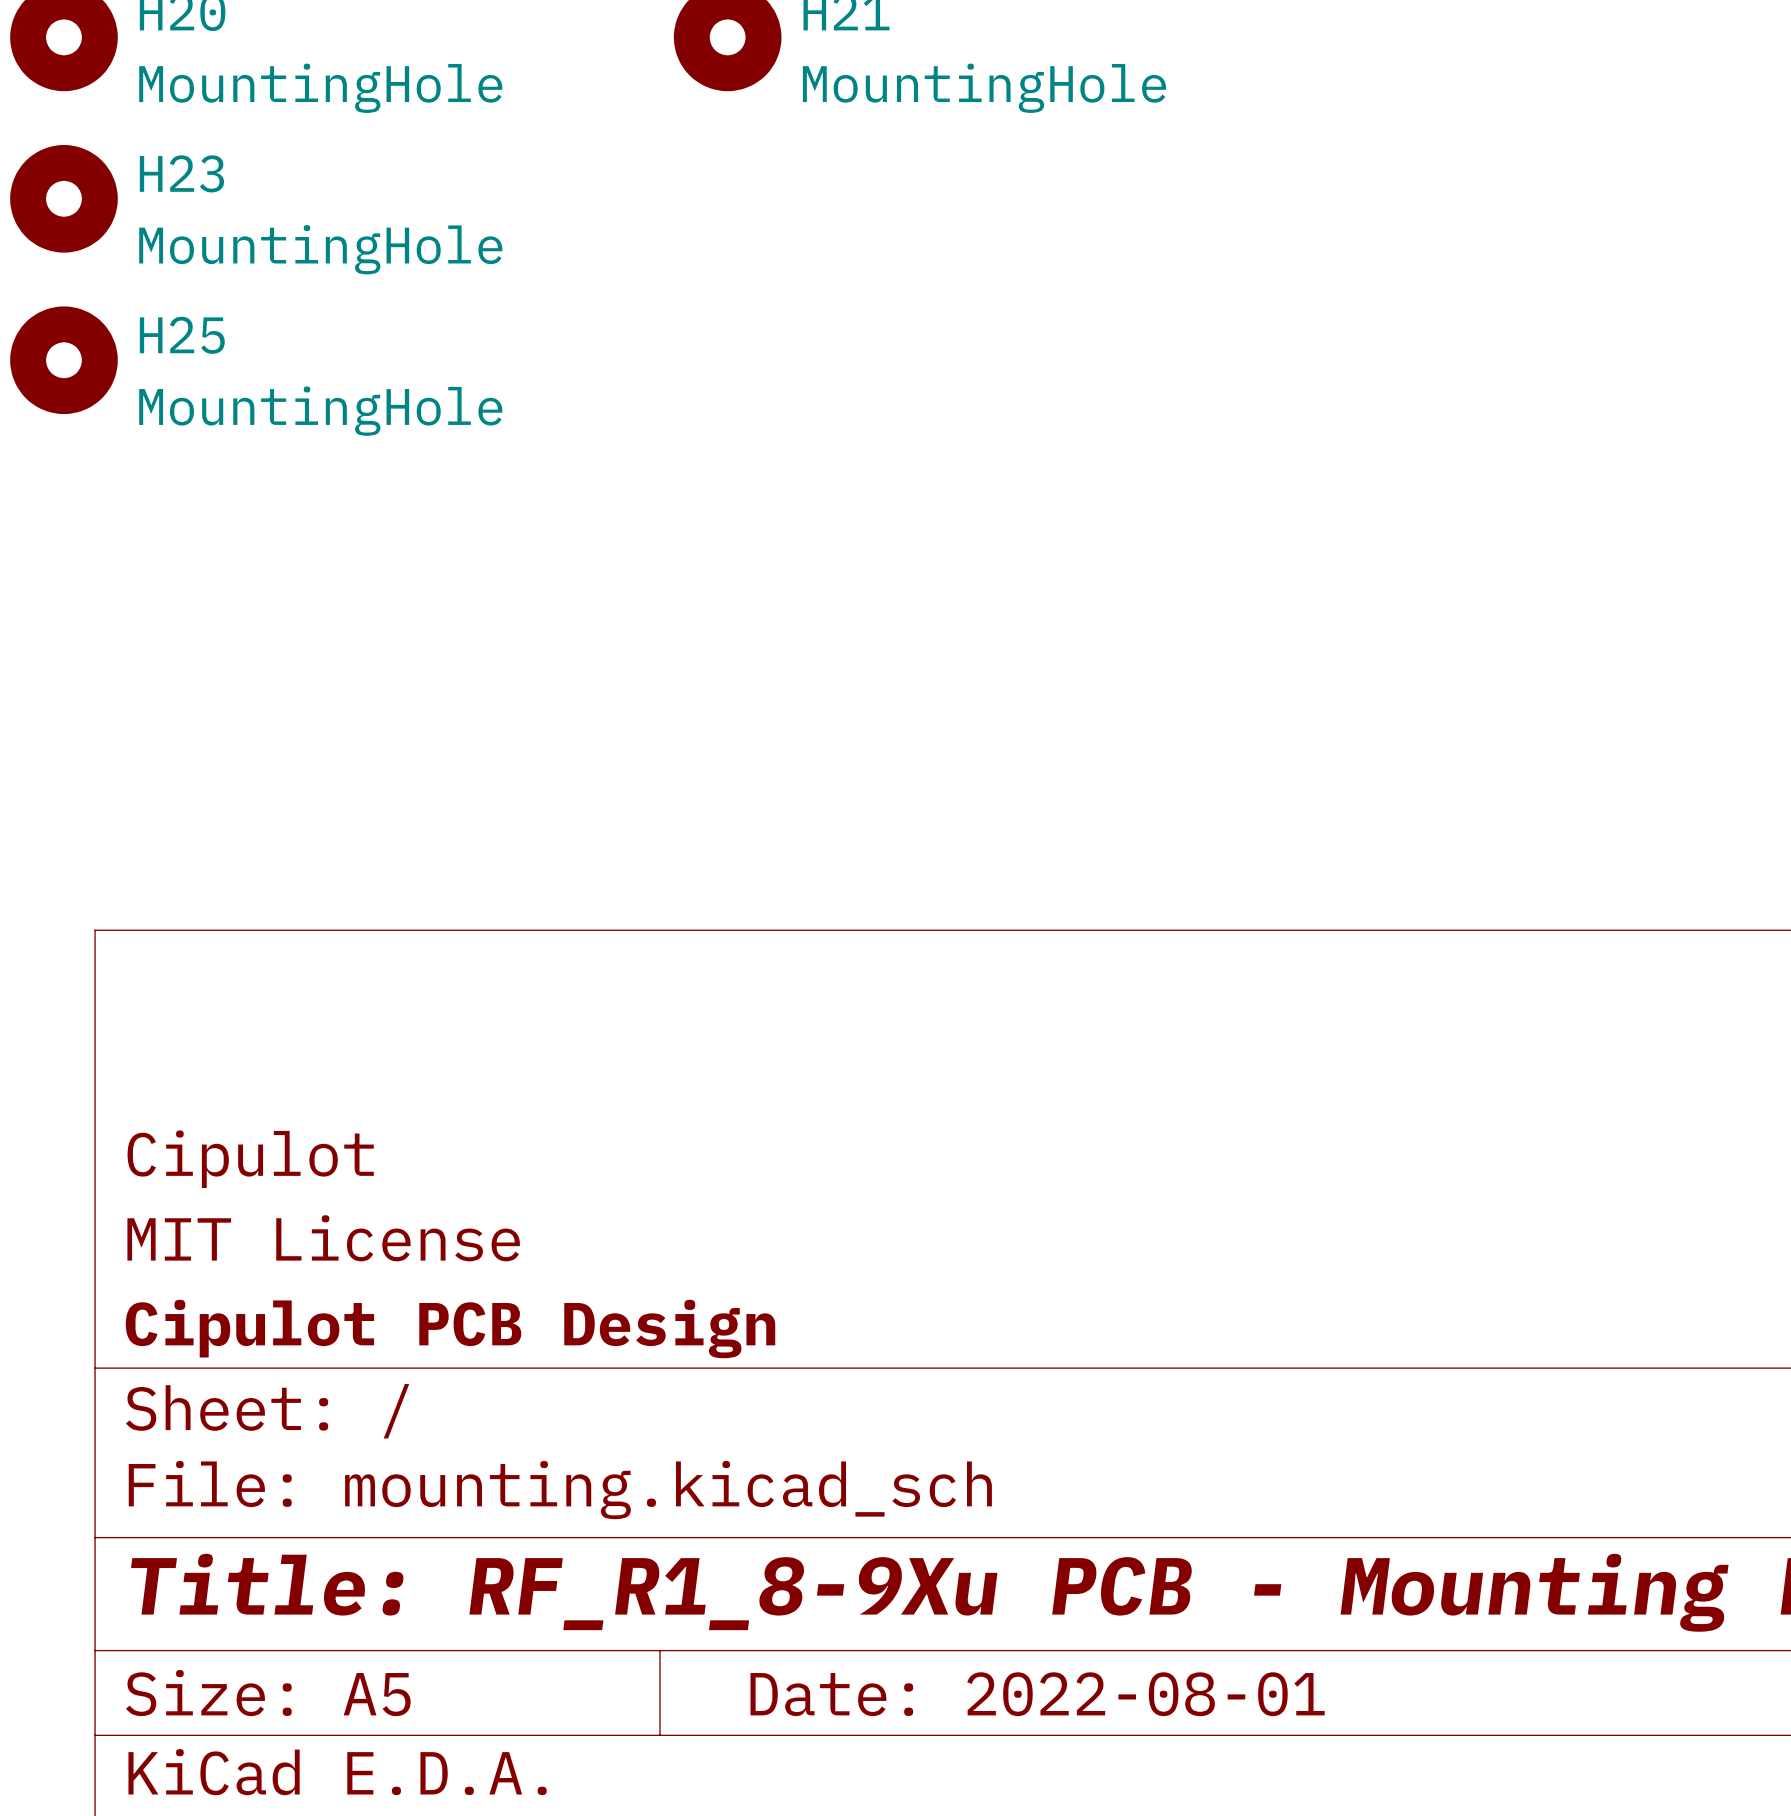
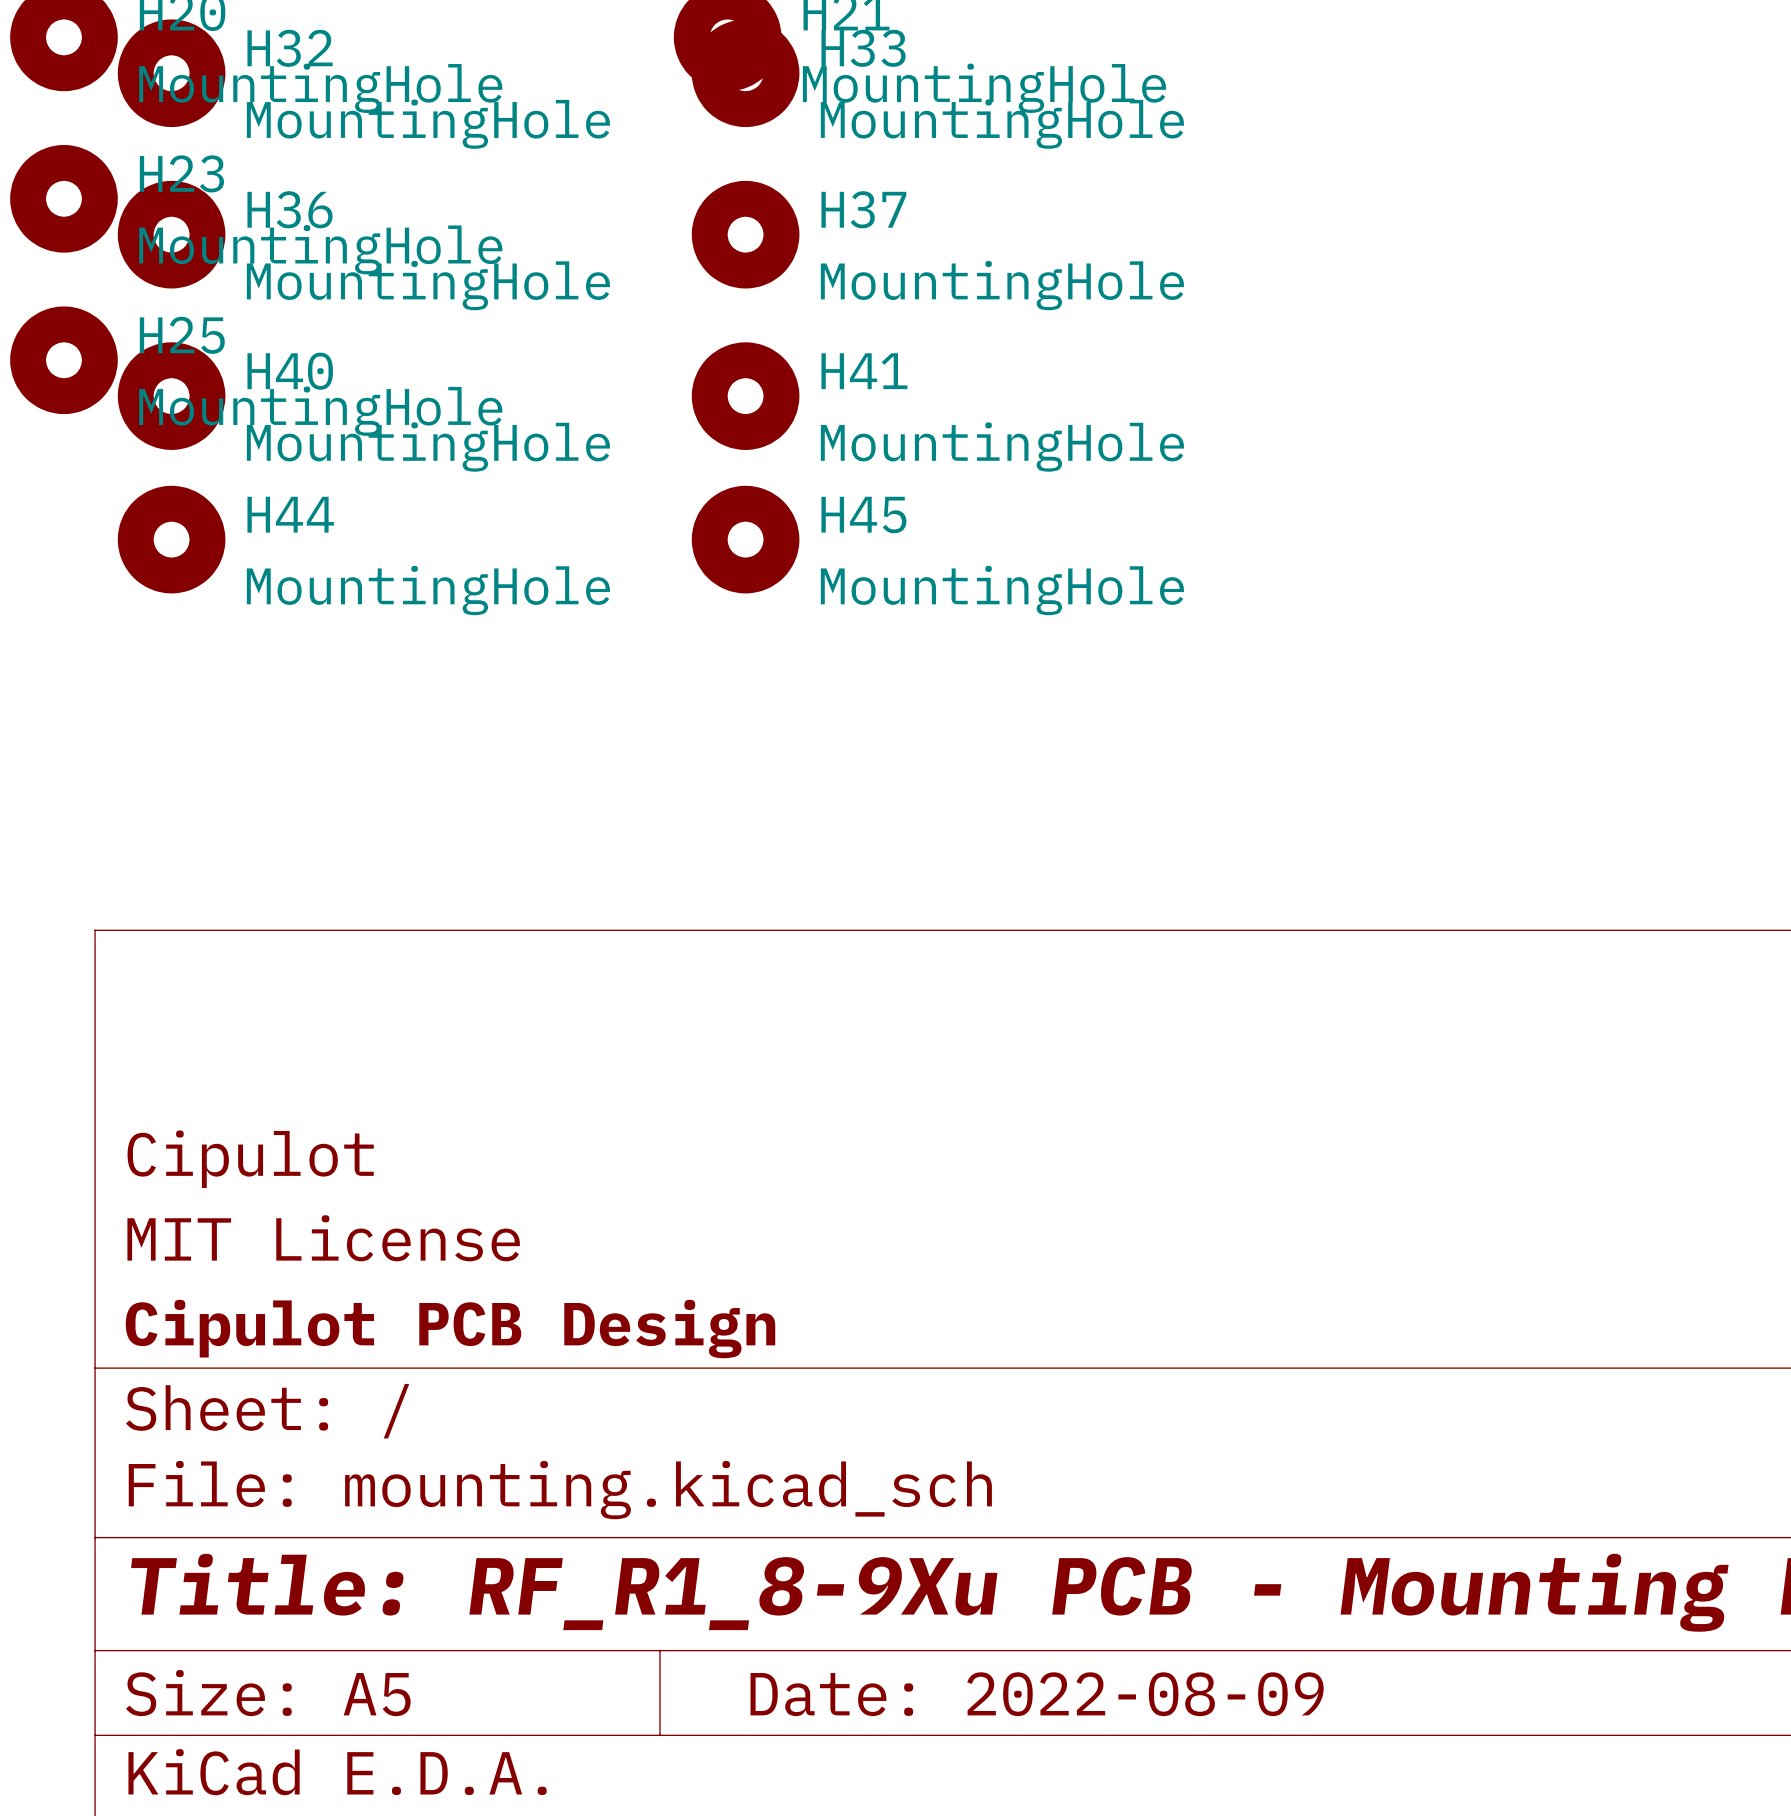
H32: none -> MountingHole (171, 73)
H33: none -> MountingHole (745, 73)
H36: none -> MountingHole (171, 234)
H37: none -> MountingHole (745, 234)
H40: none -> MountingHole (171, 396)
H41: none -> MountingHole (745, 396)
H44: none -> MountingHole (171, 539)
H45: none -> MountingHole (745, 539)
title block: Date: 2022-08-01 (1037, 1694) -> Date: 2022-08-09 (1037, 1694)

